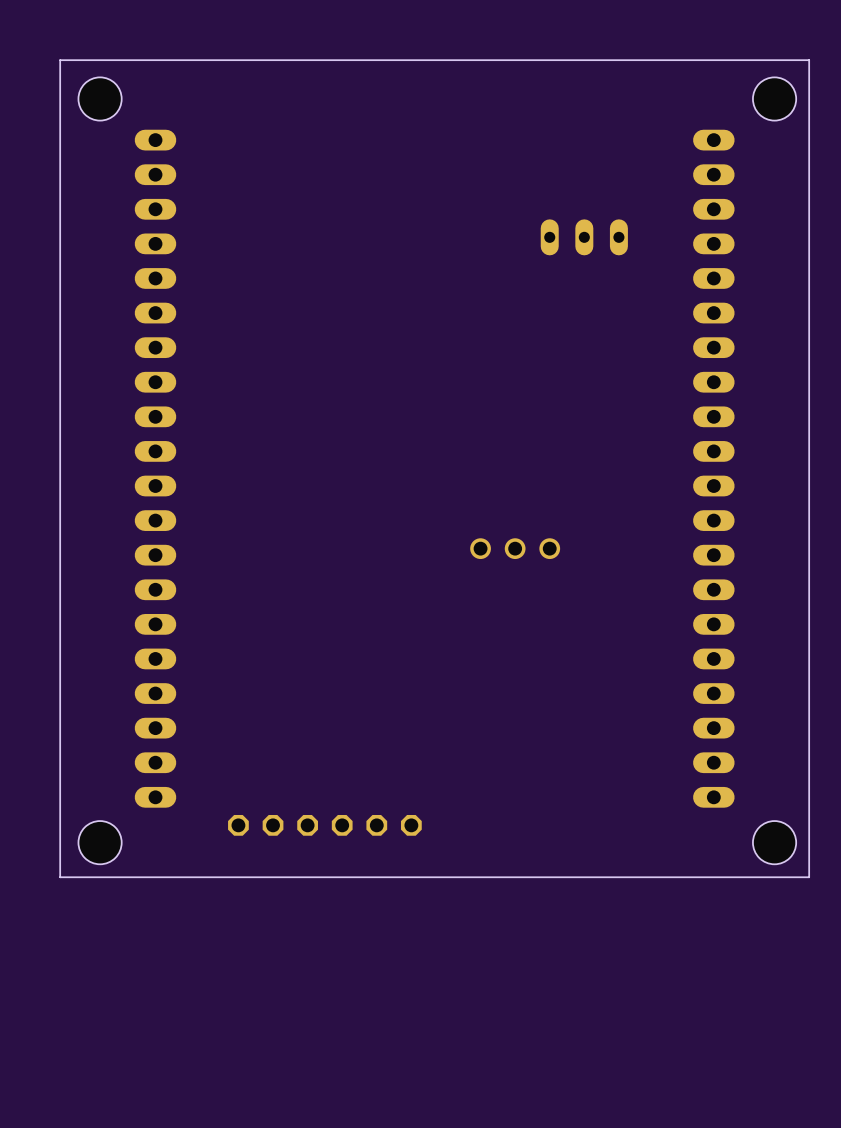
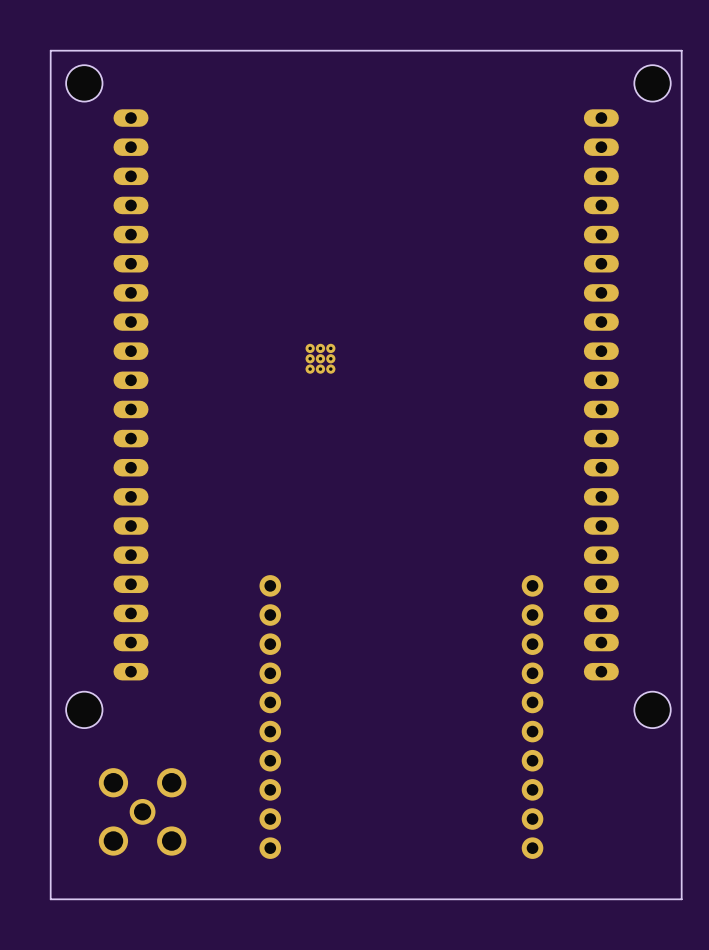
part: (584, 237) -> none
part: none -> (320, 358)
part: (515, 548) -> none
part: (324, 825) -> none
part: none -> (270, 717)
part: none -> (532, 717)
board edge: (809, 877) (60, 877) -> (681, 739) (681, 899) (50, 899) (50, 739)
part: none -> (142, 811)

